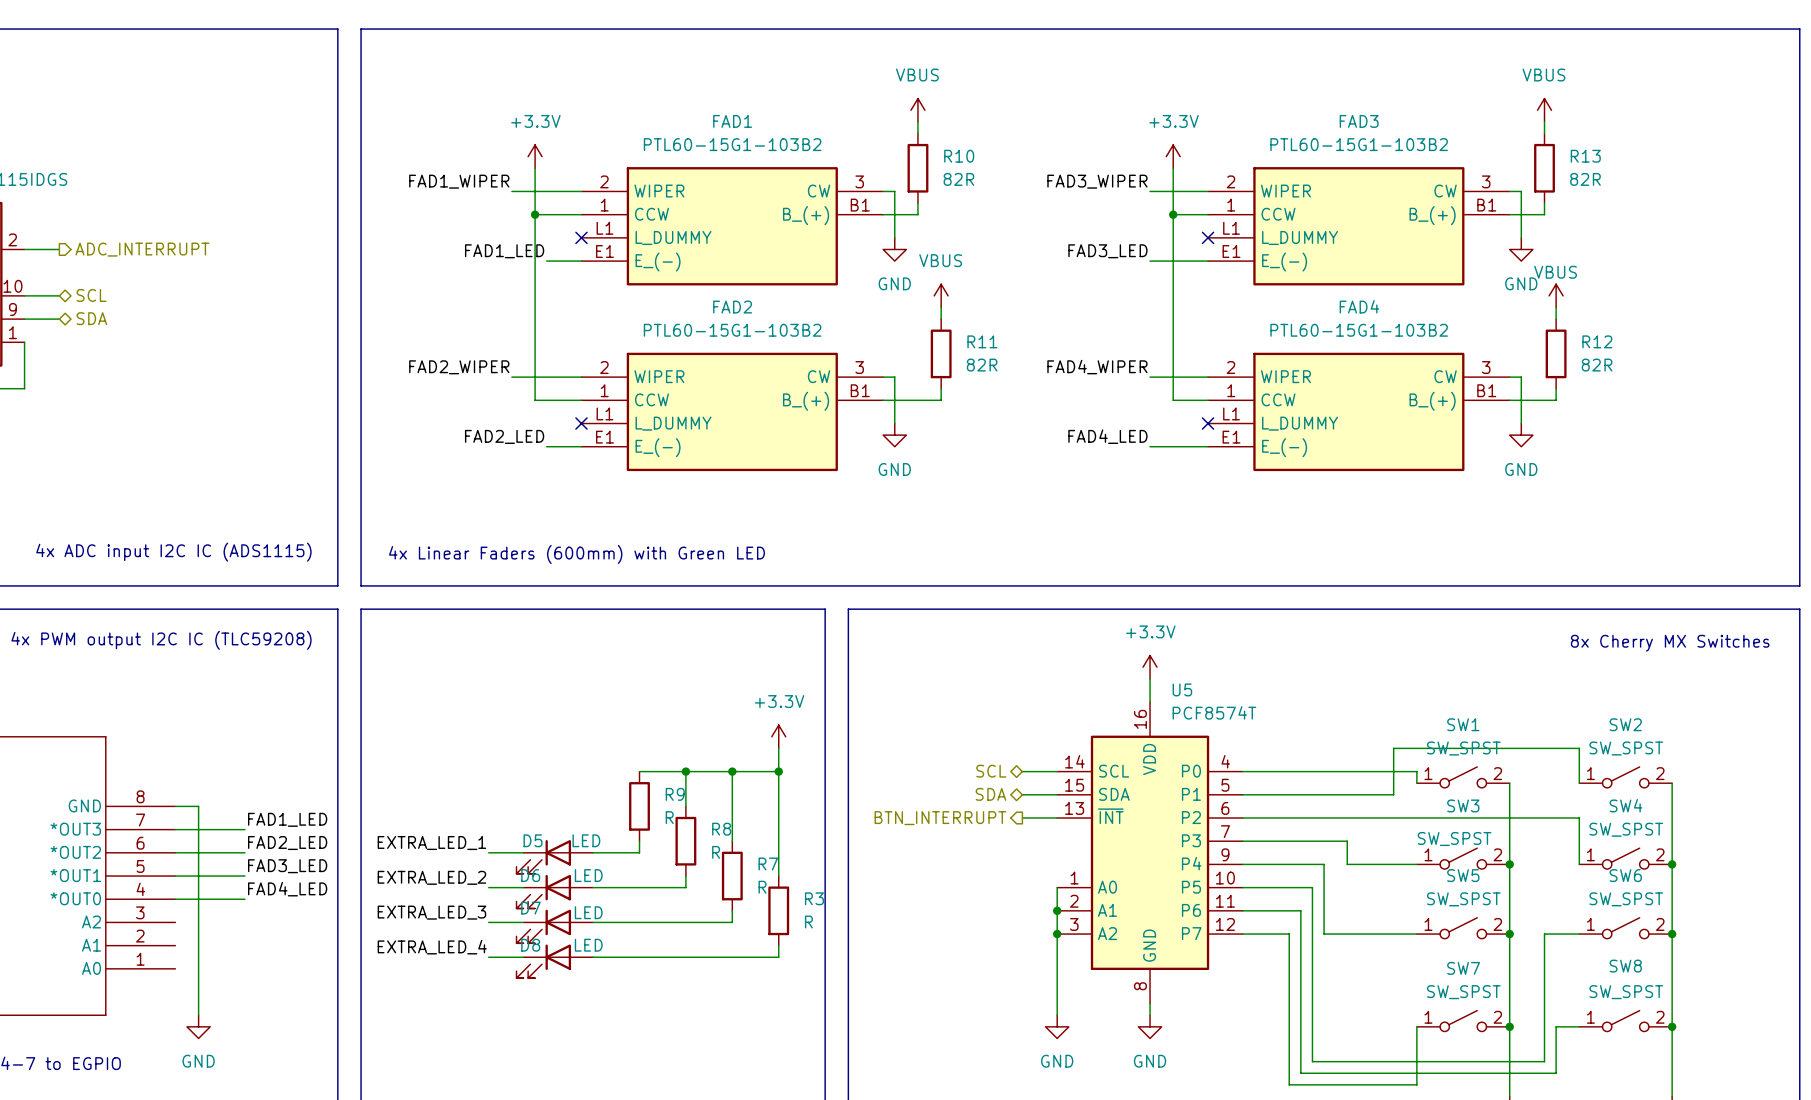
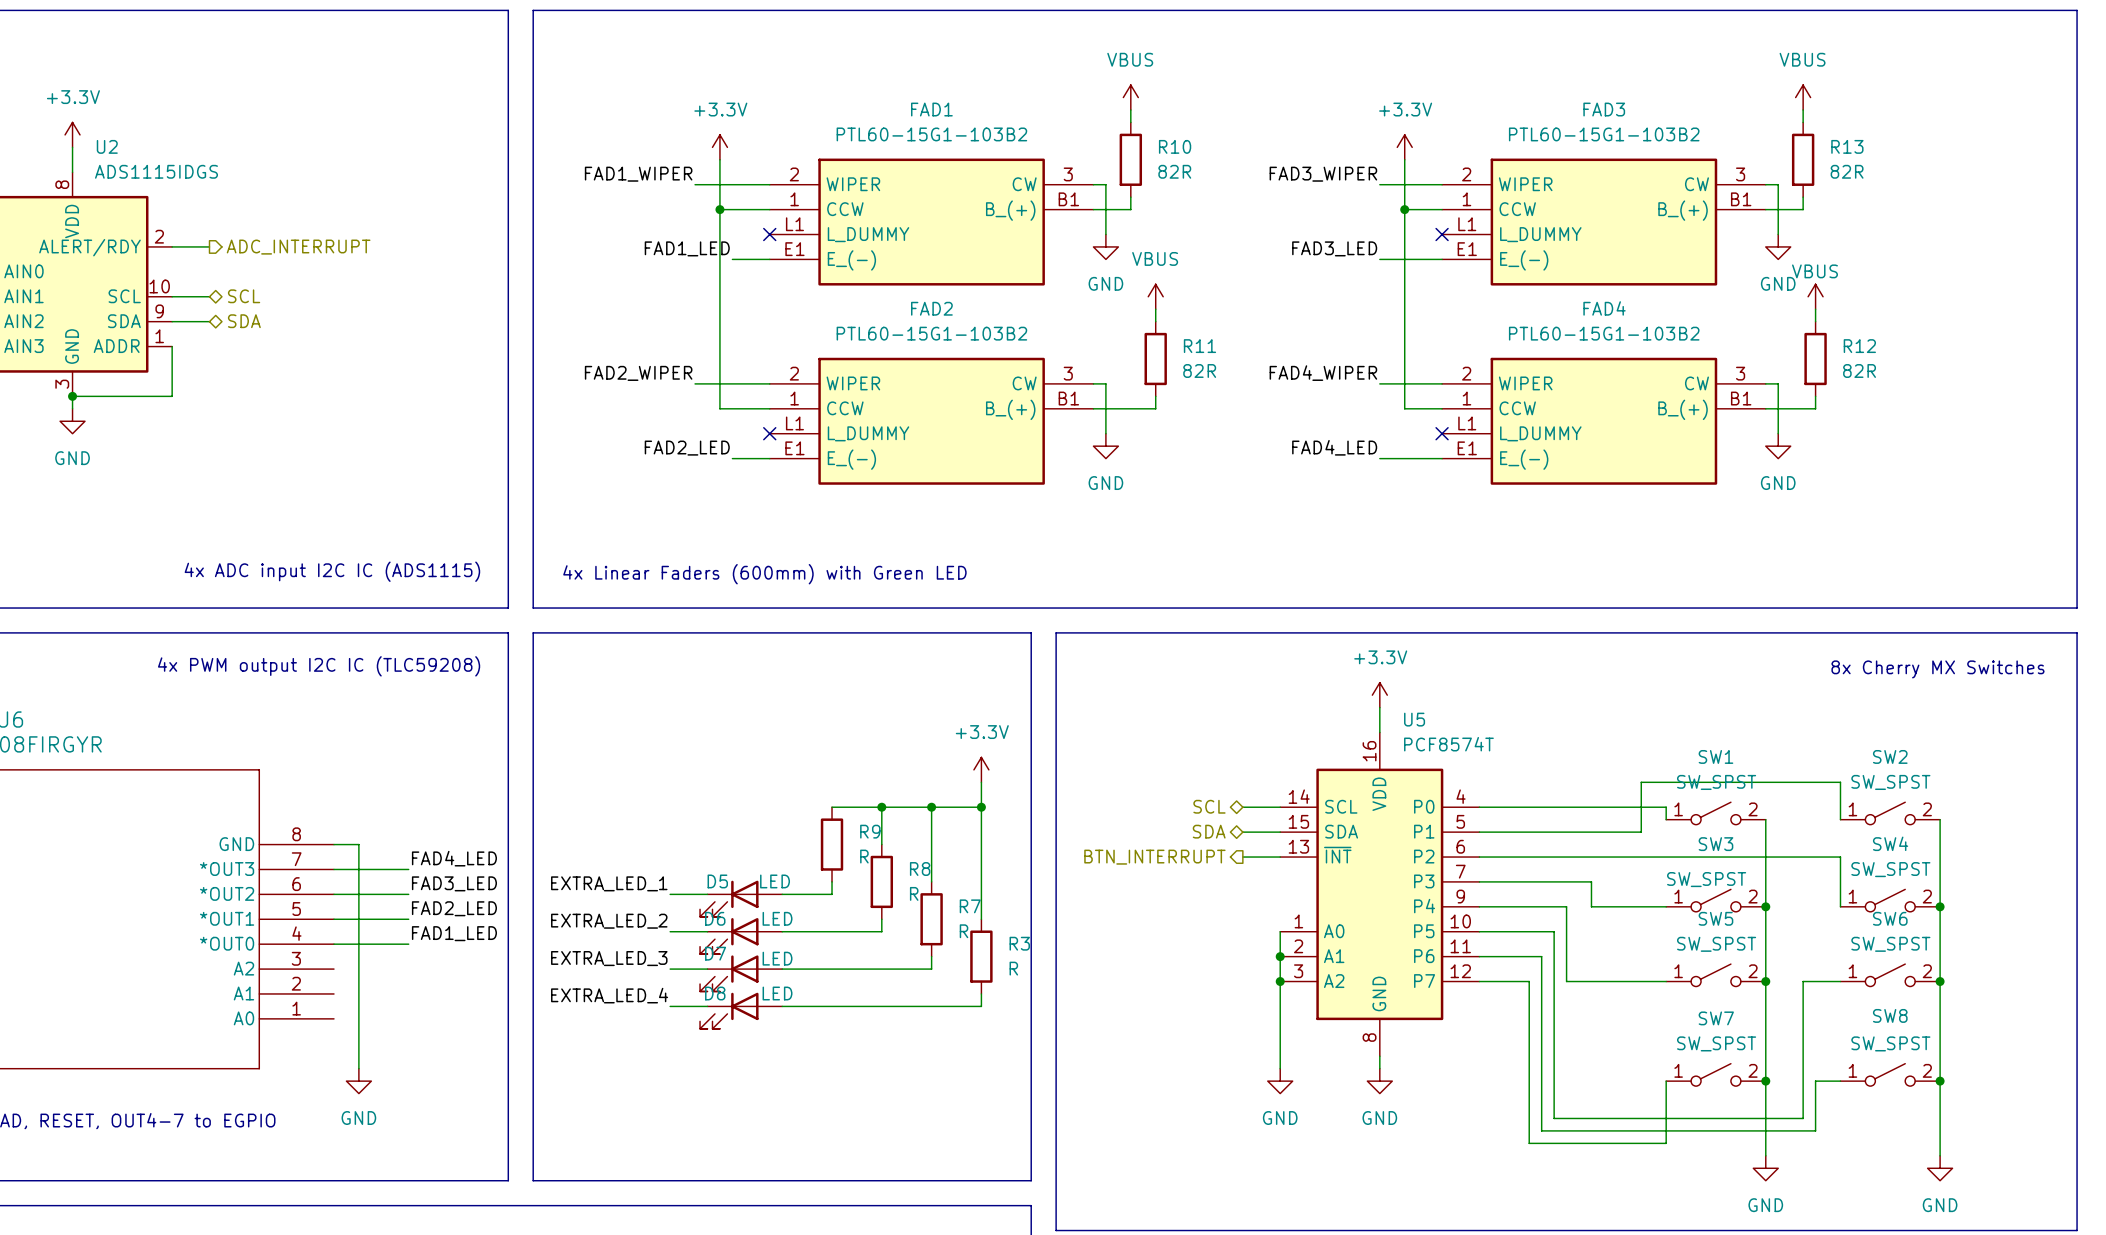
label: FAD1_LED (287, 819) -> FAD4_LED (454, 858)
label: FAD2_LED (287, 843) -> FAD3_LED (454, 883)
label: FAD3_LED (287, 866) -> FAD2_LED (454, 908)
label: FAD4_LED (287, 889) -> FAD1_LED (454, 933)

